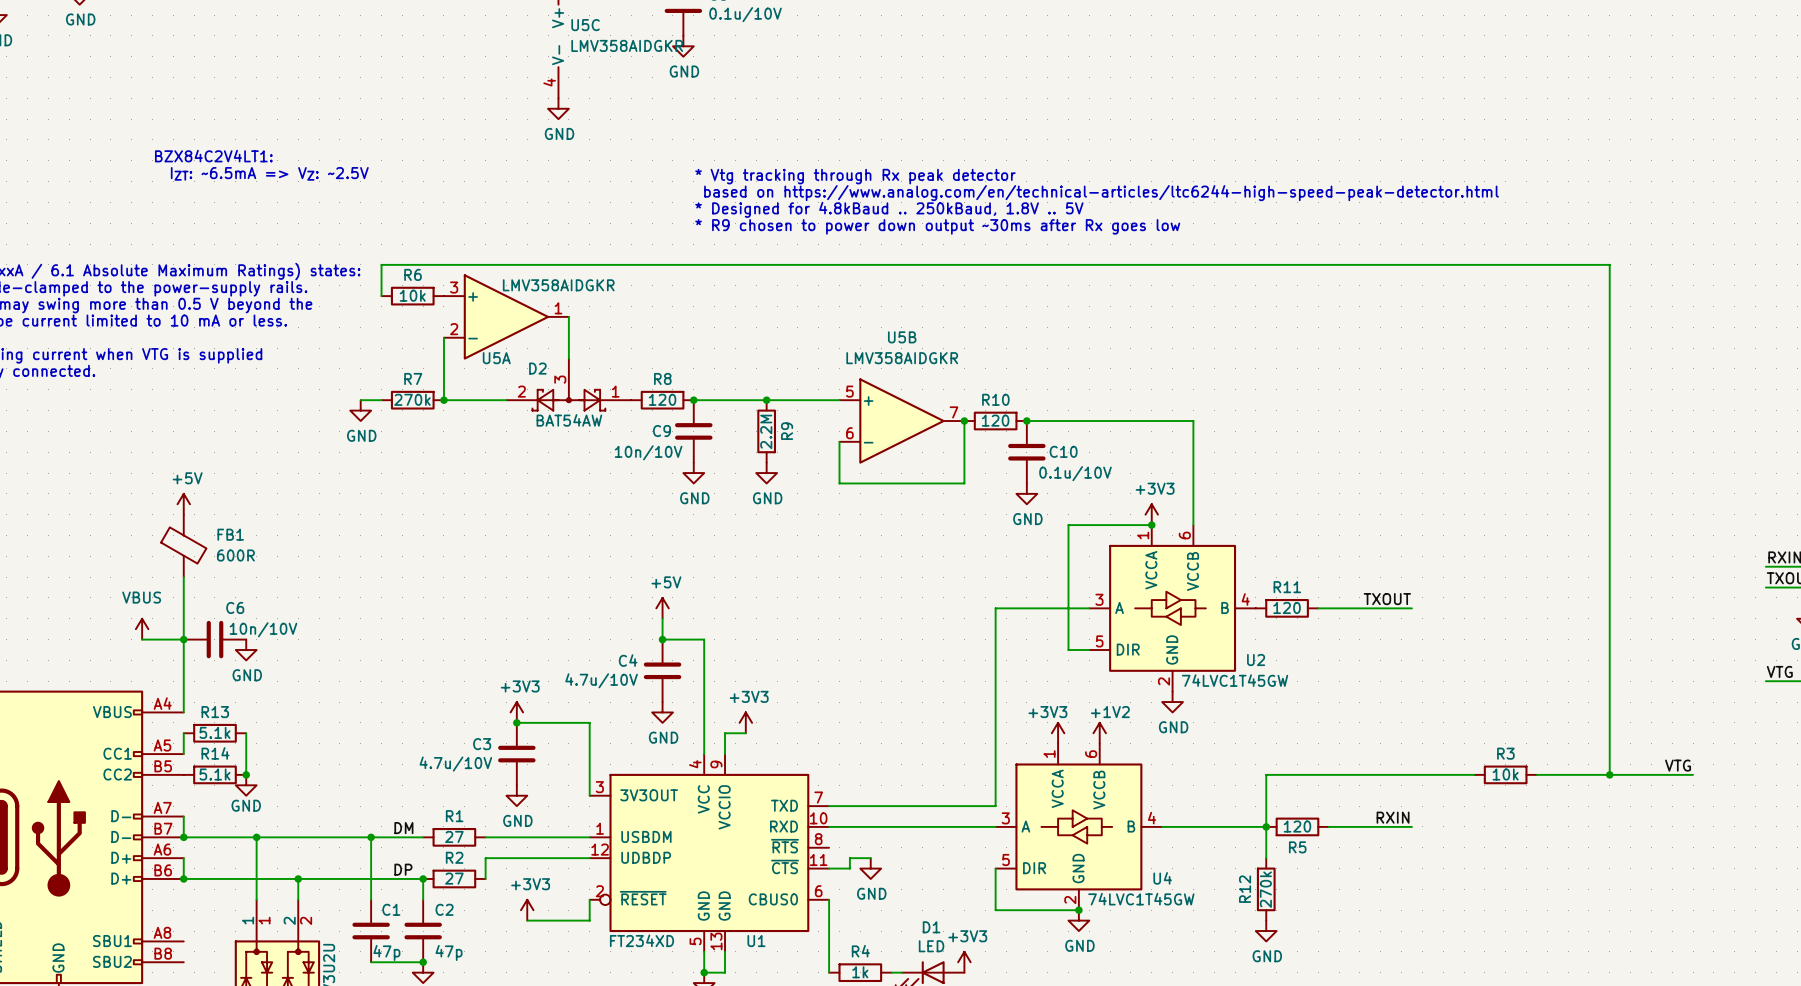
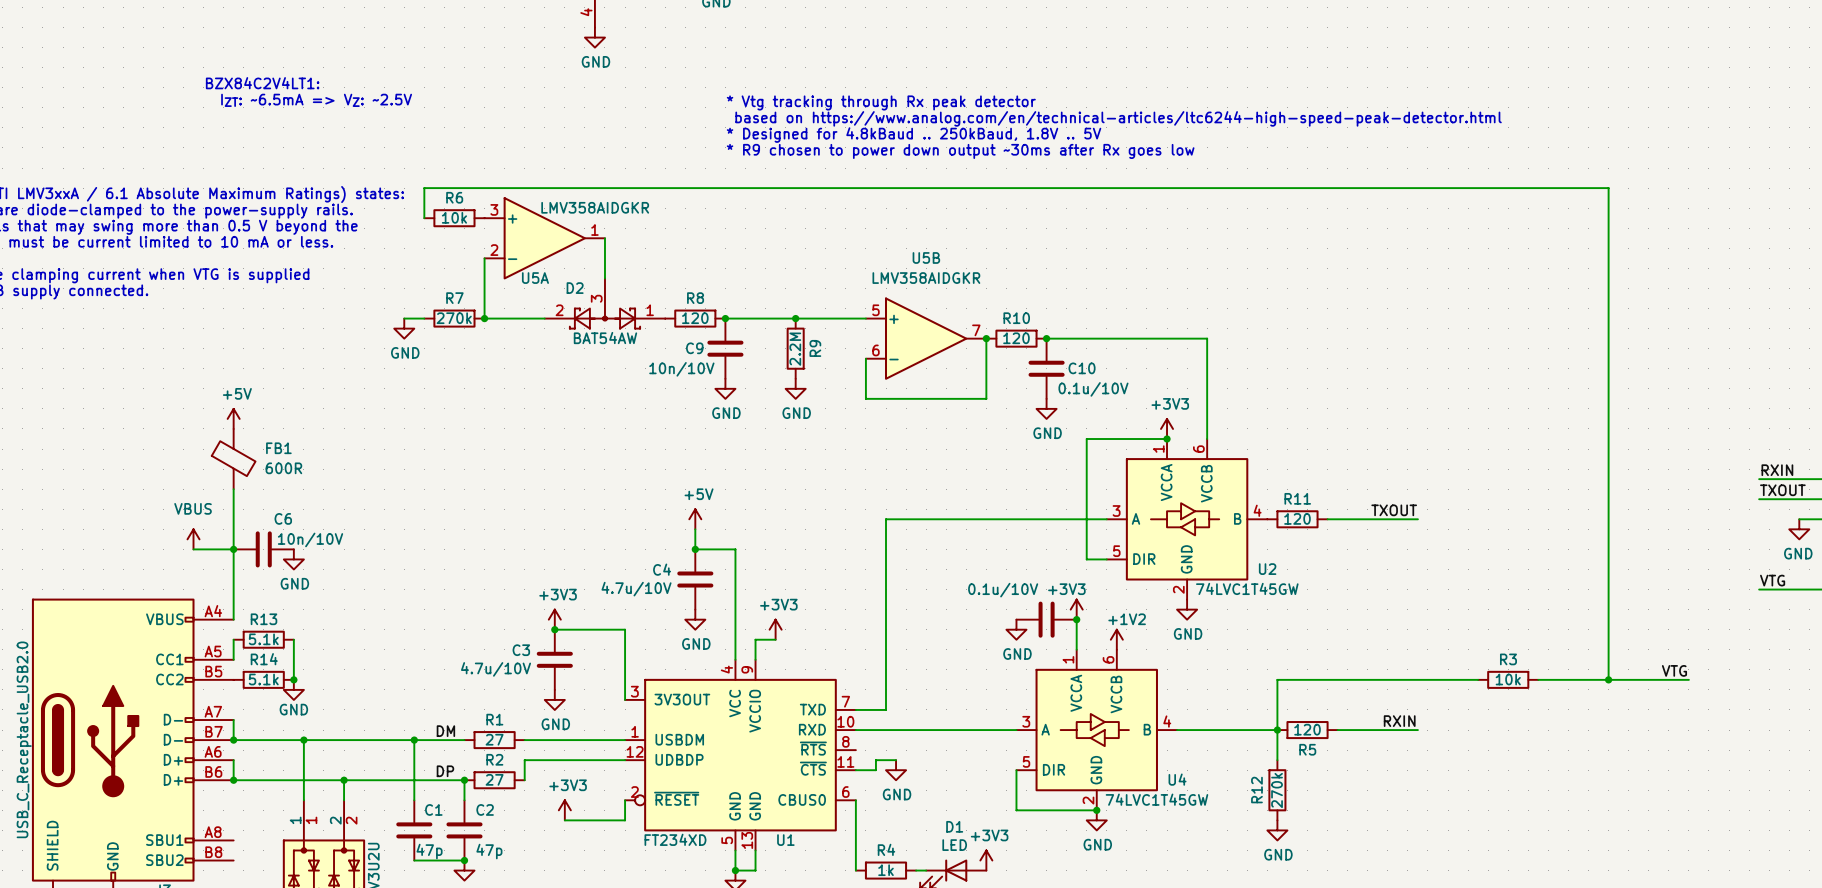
wire: (995, 608) (995, 806) (860, 806) -> (1016, 519) (886, 519) (886, 709)
part: none -> 0.1u/10V (1046, 619)
junction: none -> (1076, 619)
power symbol: none -> GND (1016, 629)
power symbol position: +3V3 (1058, 733) -> +3V3 (1076, 609)

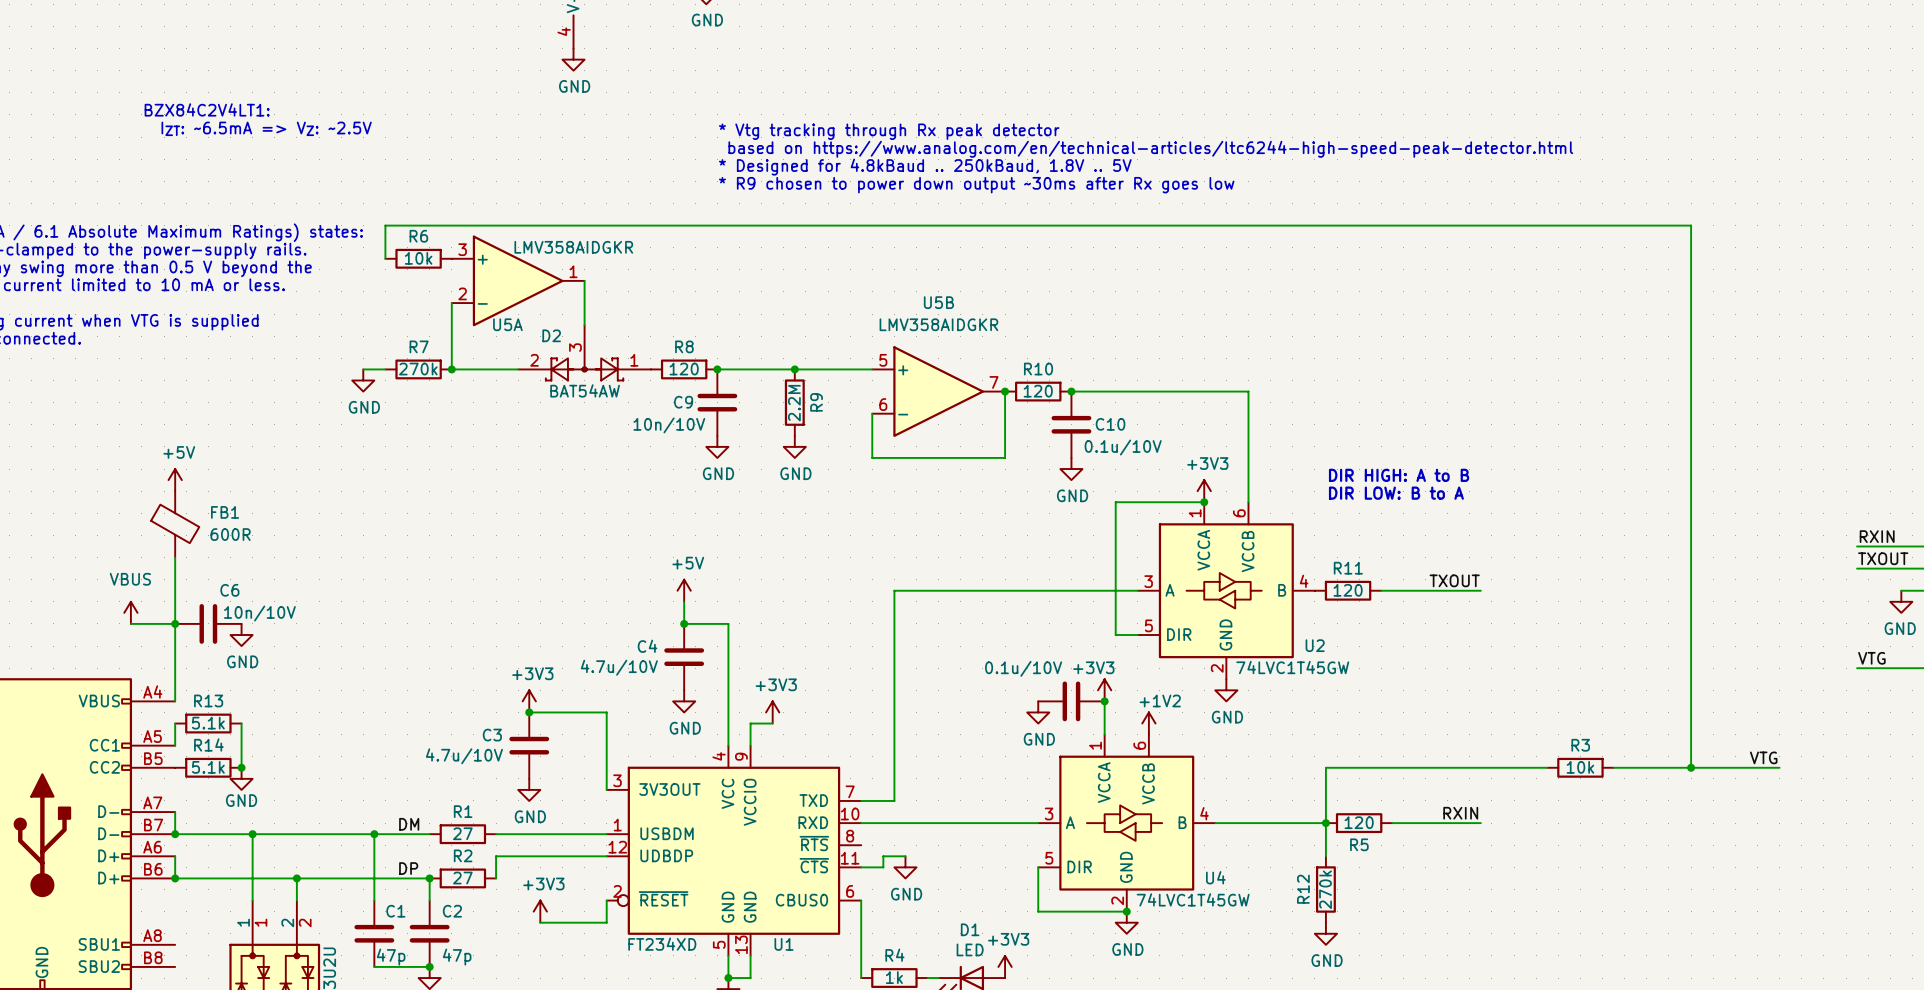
text: none -> DIR HIGH: A to B (1399, 475)
text: none -> DIR LOW: B to A (1396, 493)

